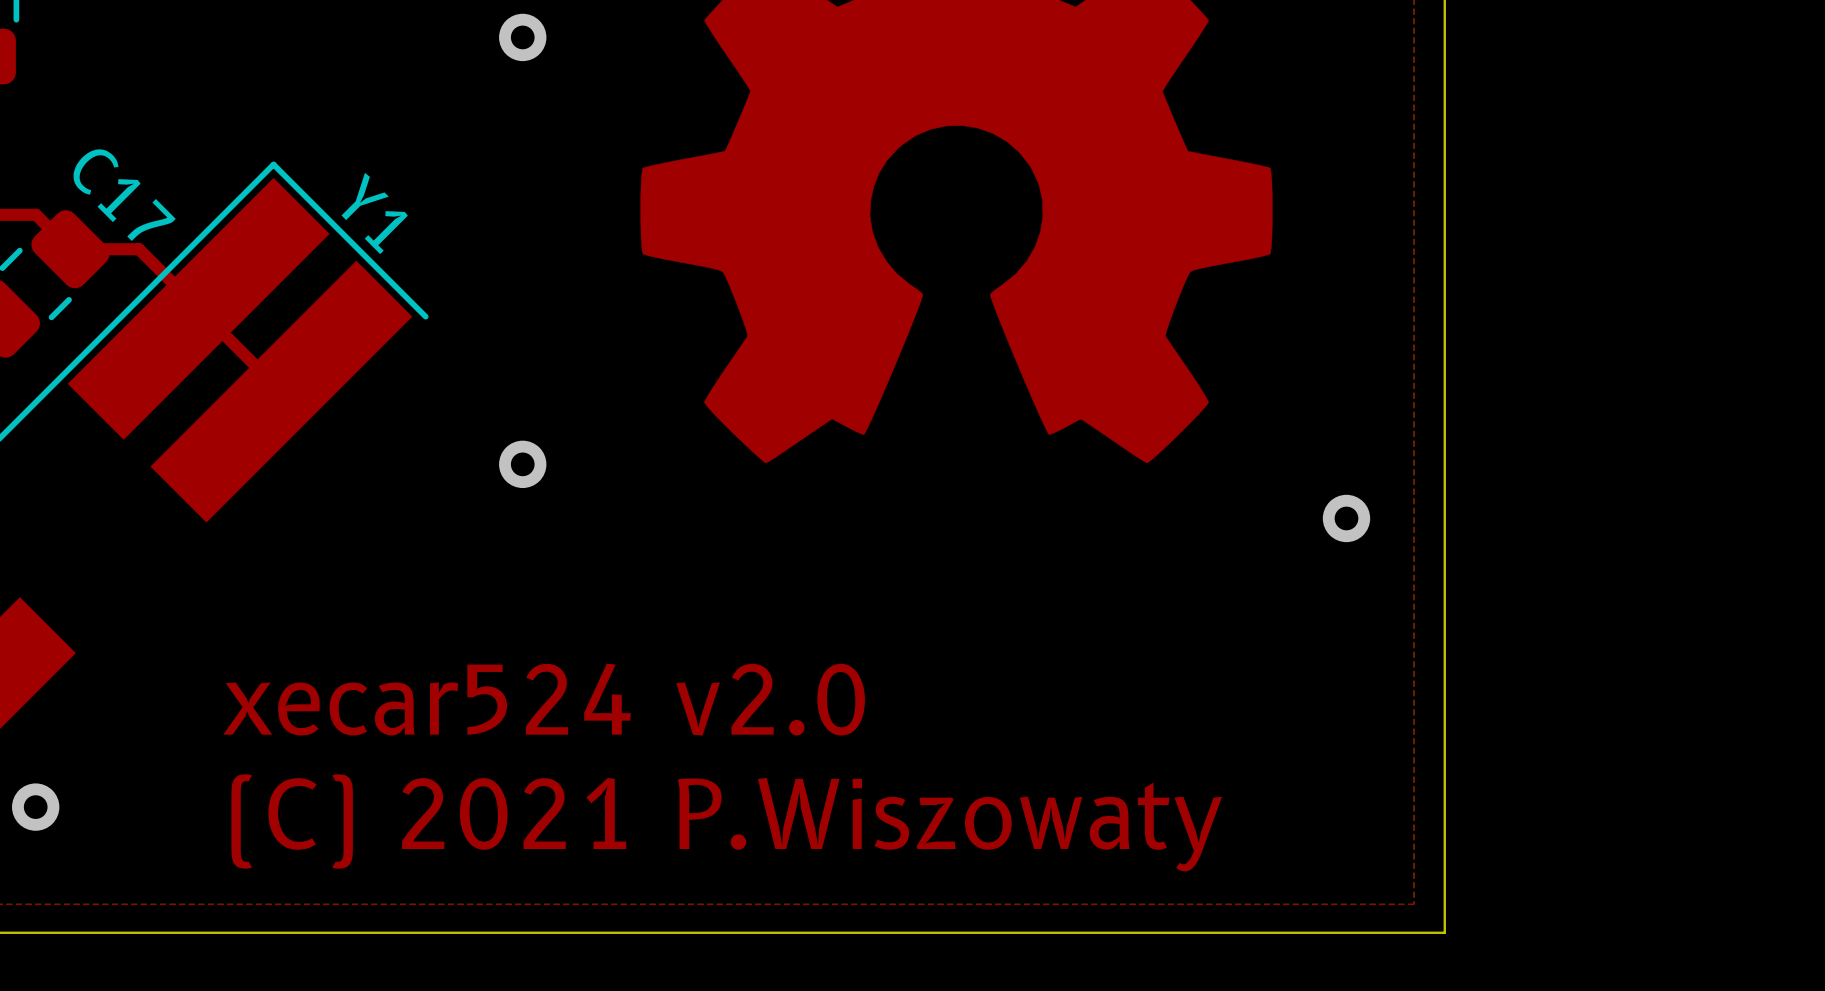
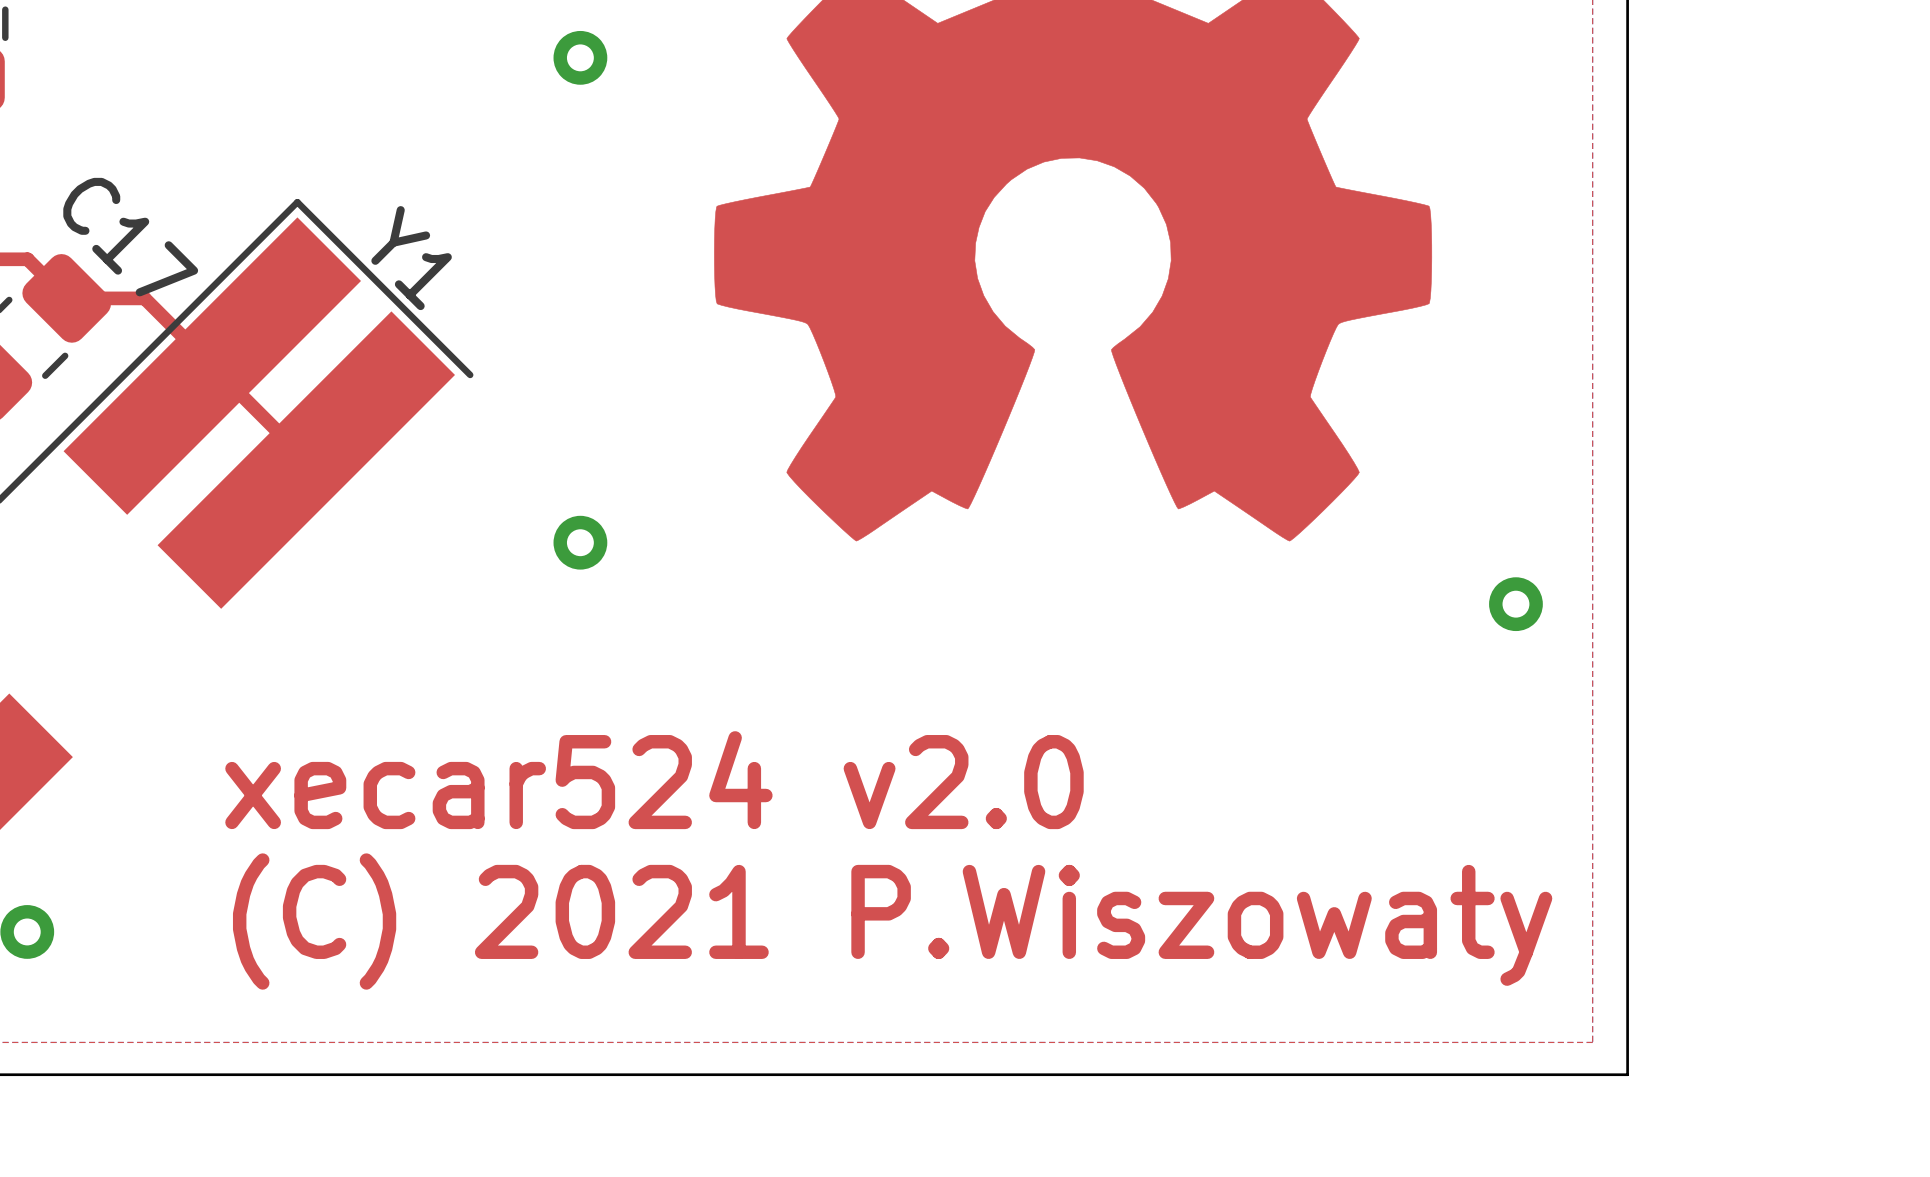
text position: xecar524 v2.0 (544, 699) -> xecar524 v2.0 (654, 780)
text position: (C) 2021 P.Wiszowaty (726, 822) -> (C) 2021 P.Wiszowaty (892, 921)

